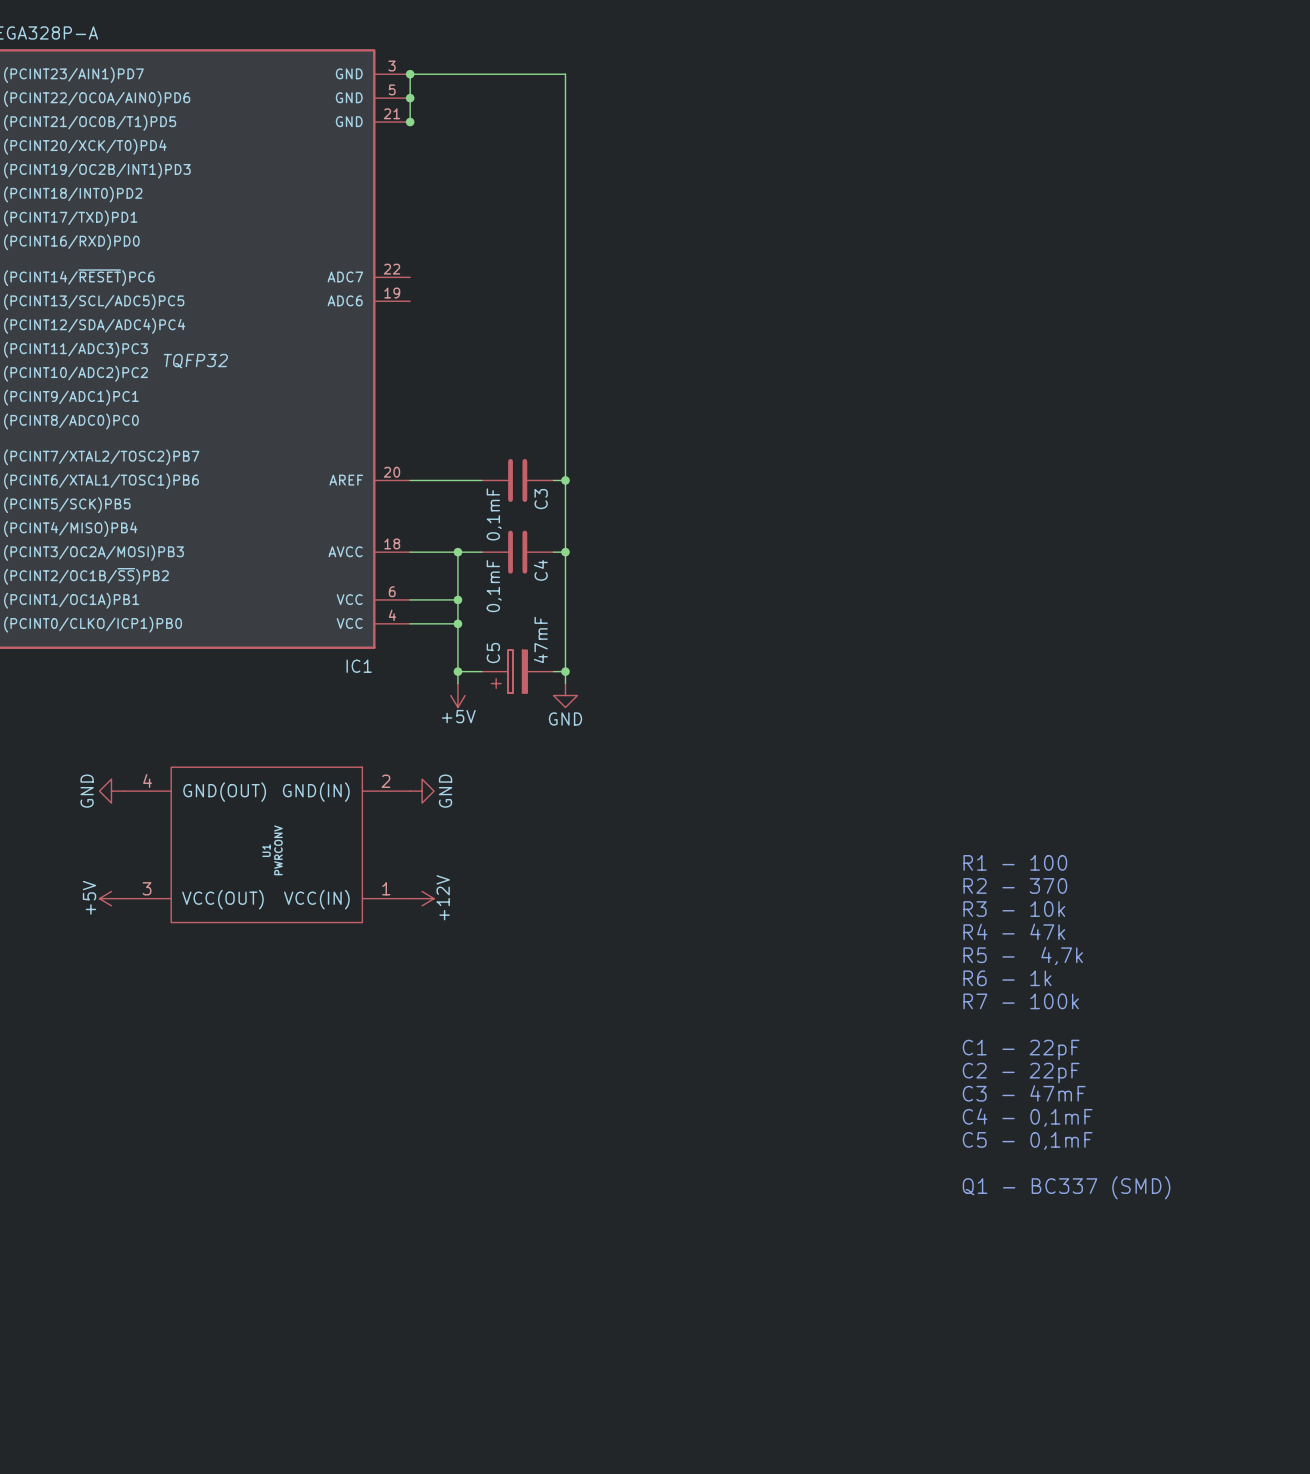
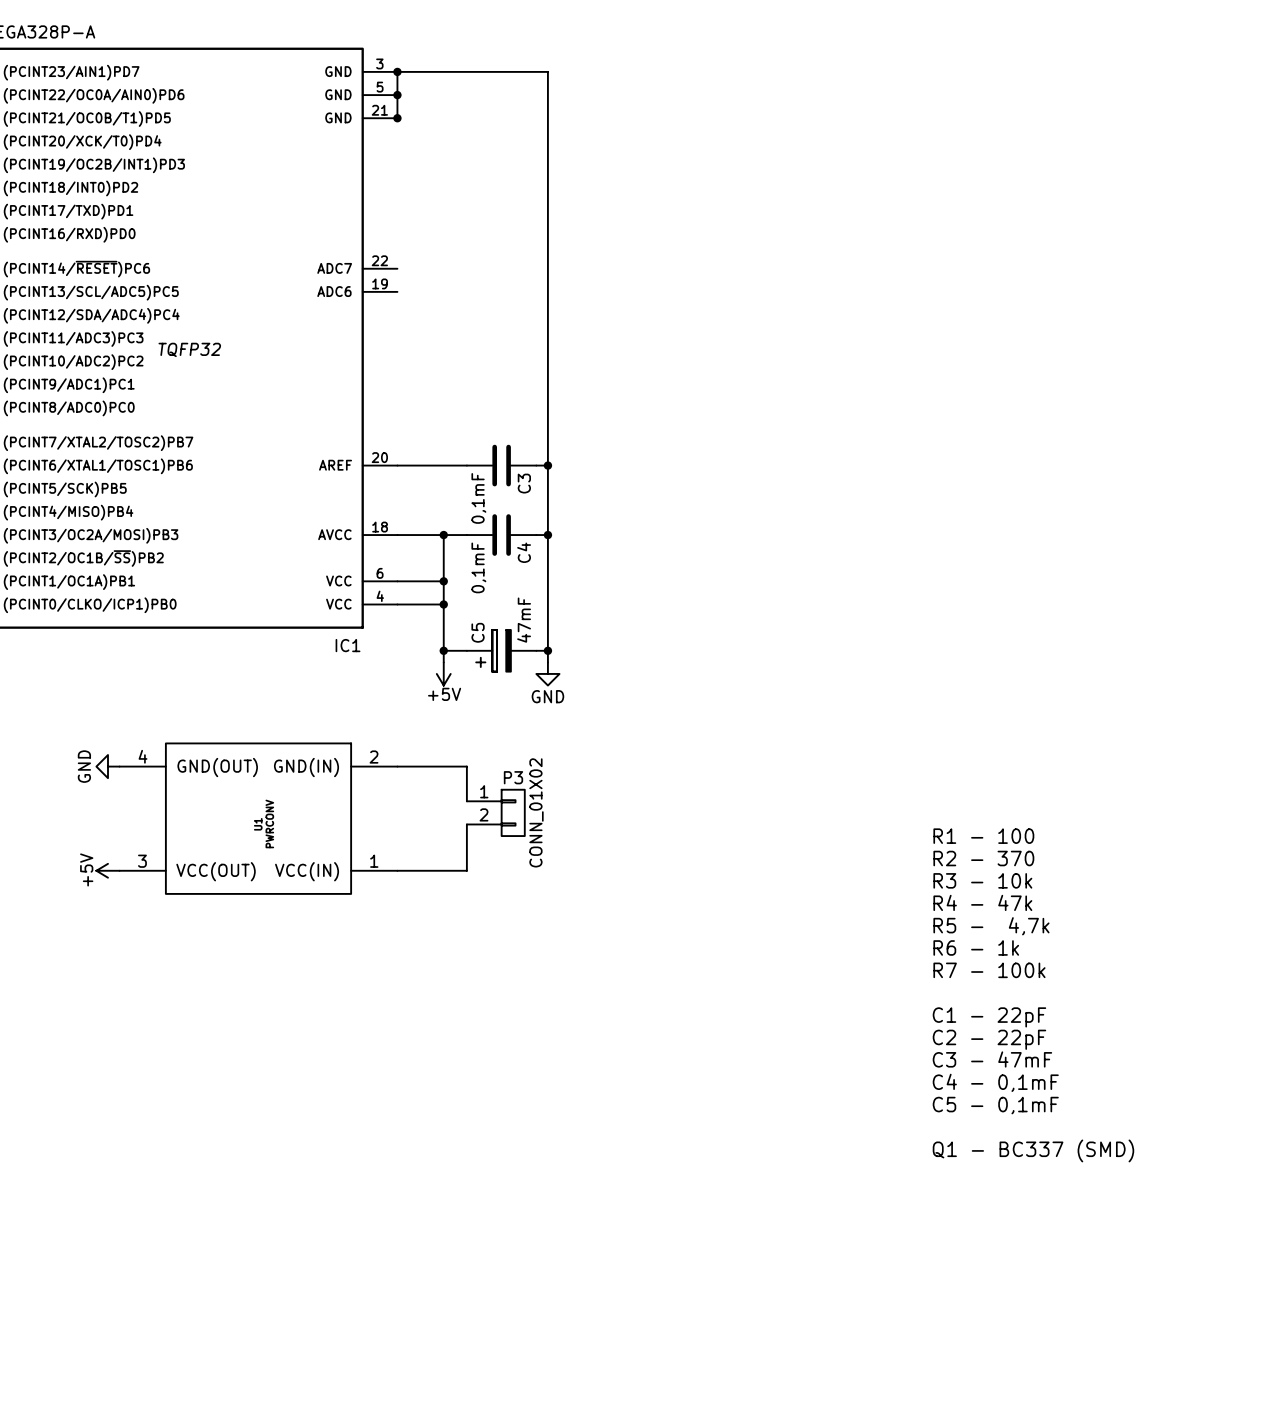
wire: none -> (397, 766) (466, 766) (466, 801)
power symbol: GND (422, 791) -> none
P3: none -> CONN_01X02 (495, 812)
wire: none -> (466, 824) (466, 870) (397, 870)
power symbol: +12V (422, 898) -> none

